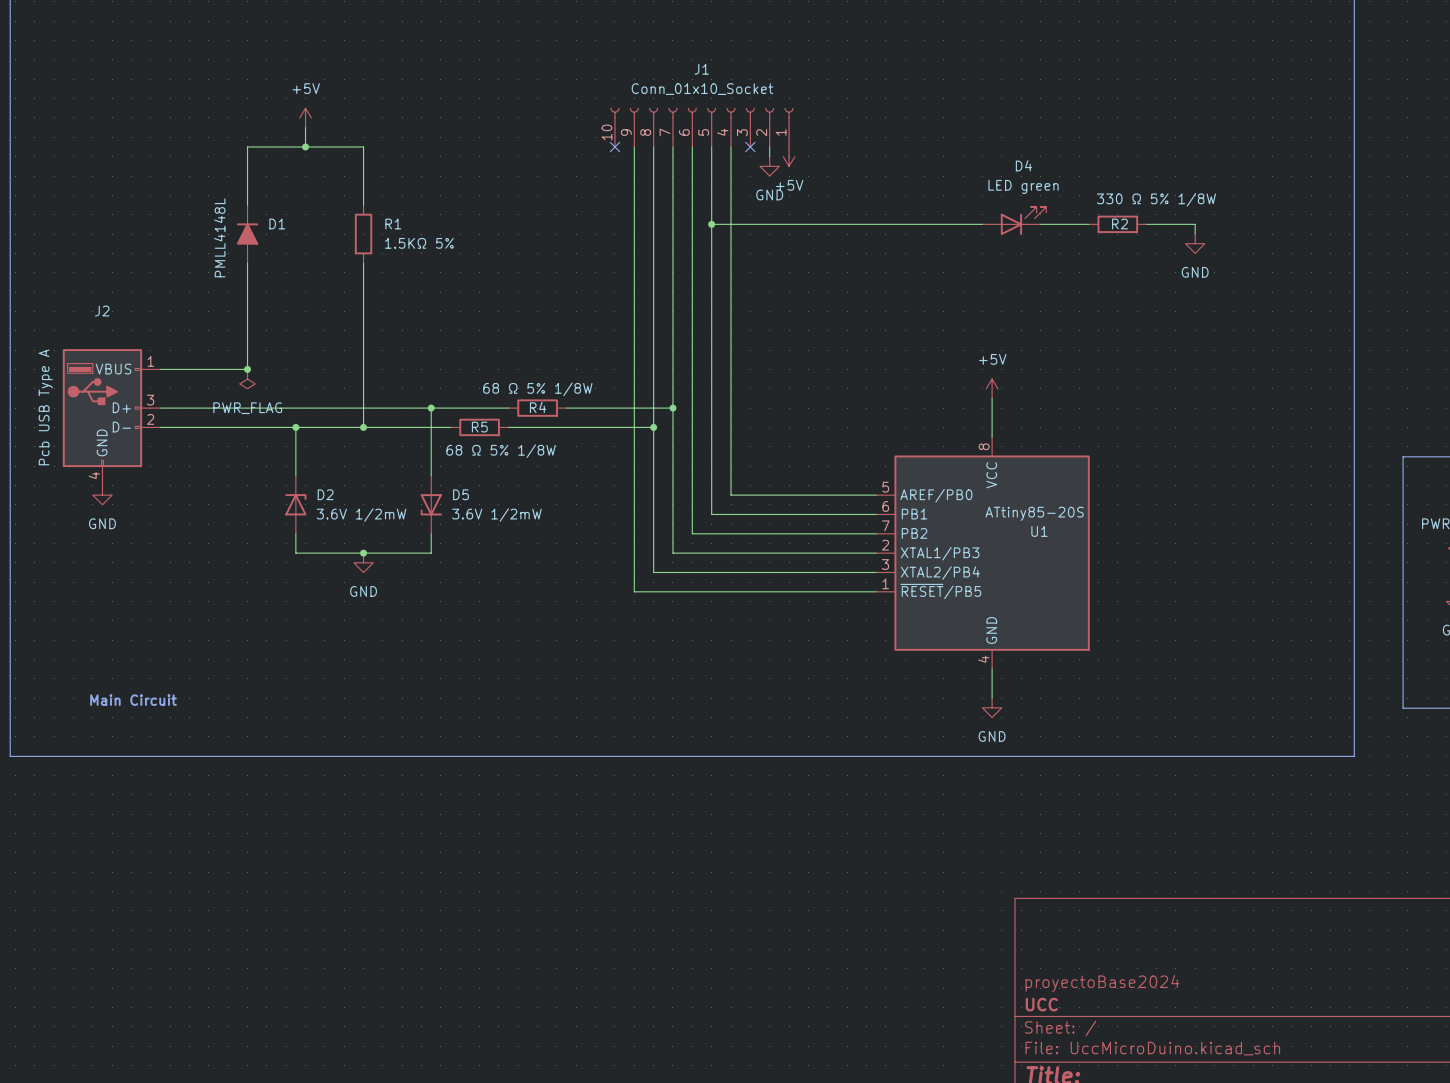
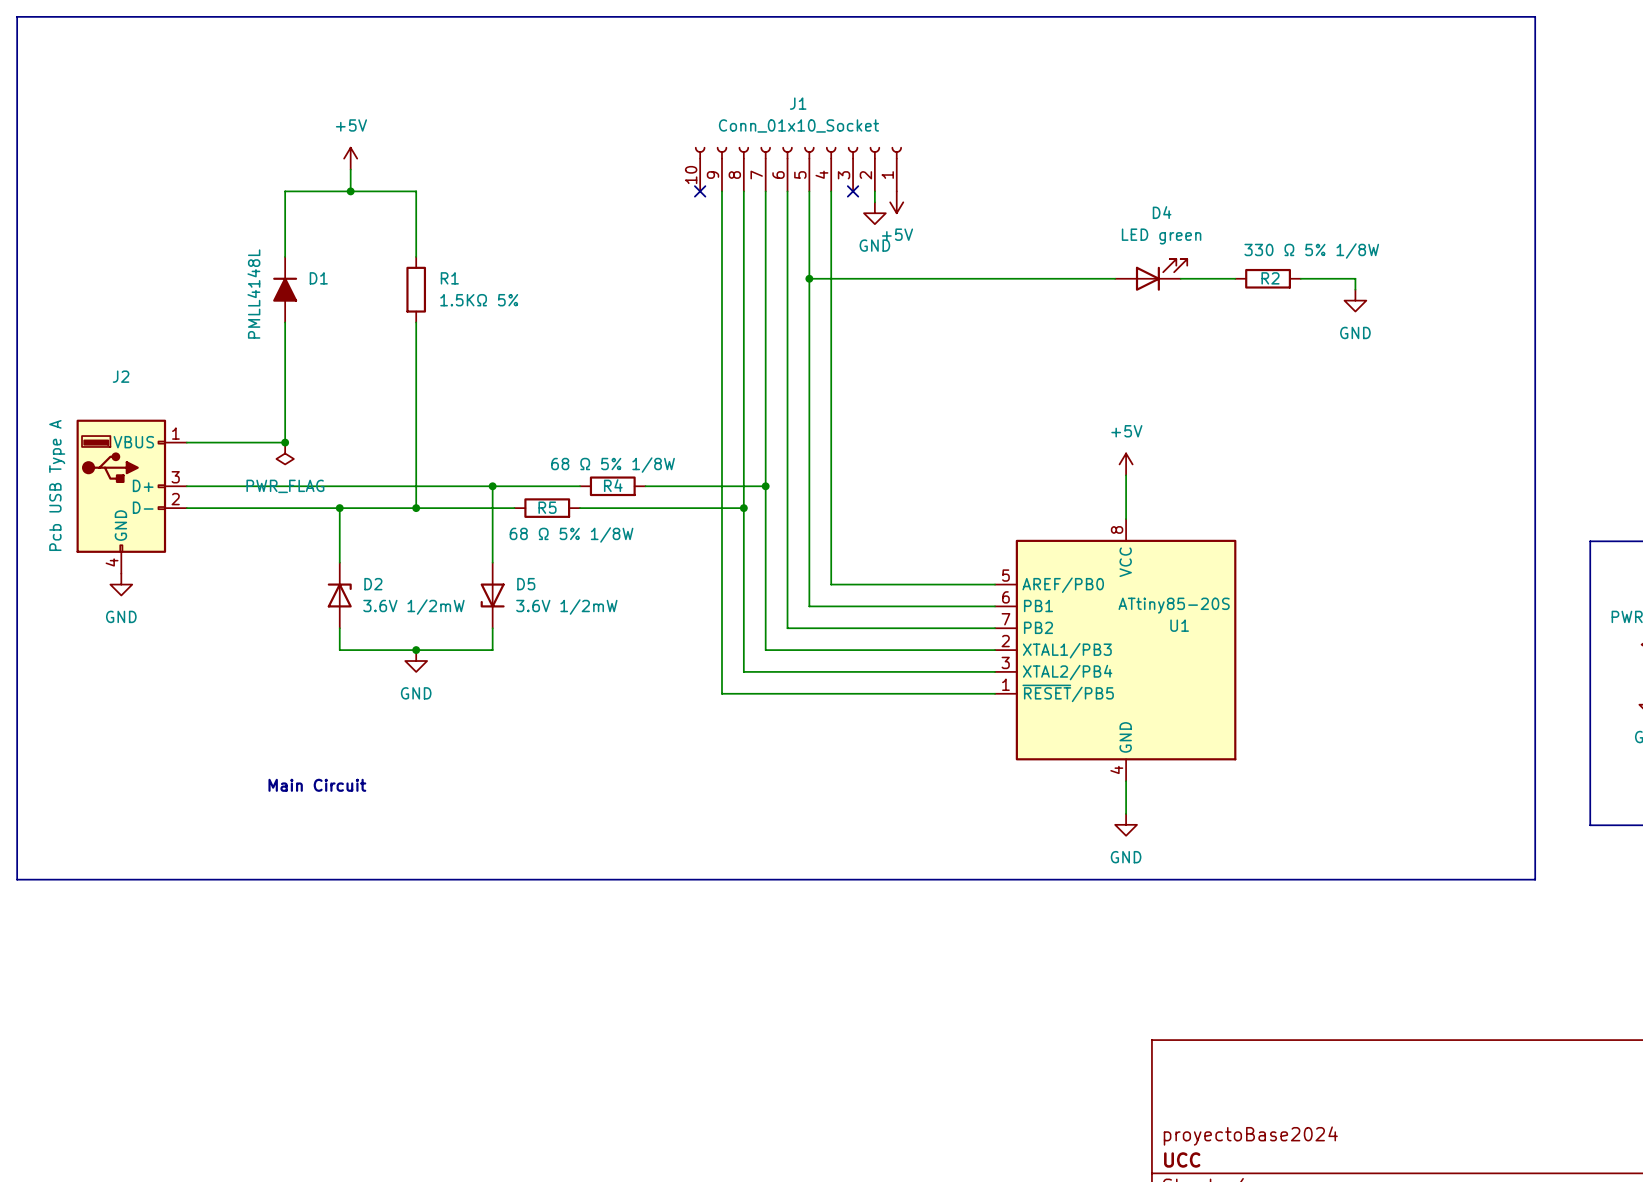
text position: Main Circuit (133, 700) -> Main Circuit (317, 785)

